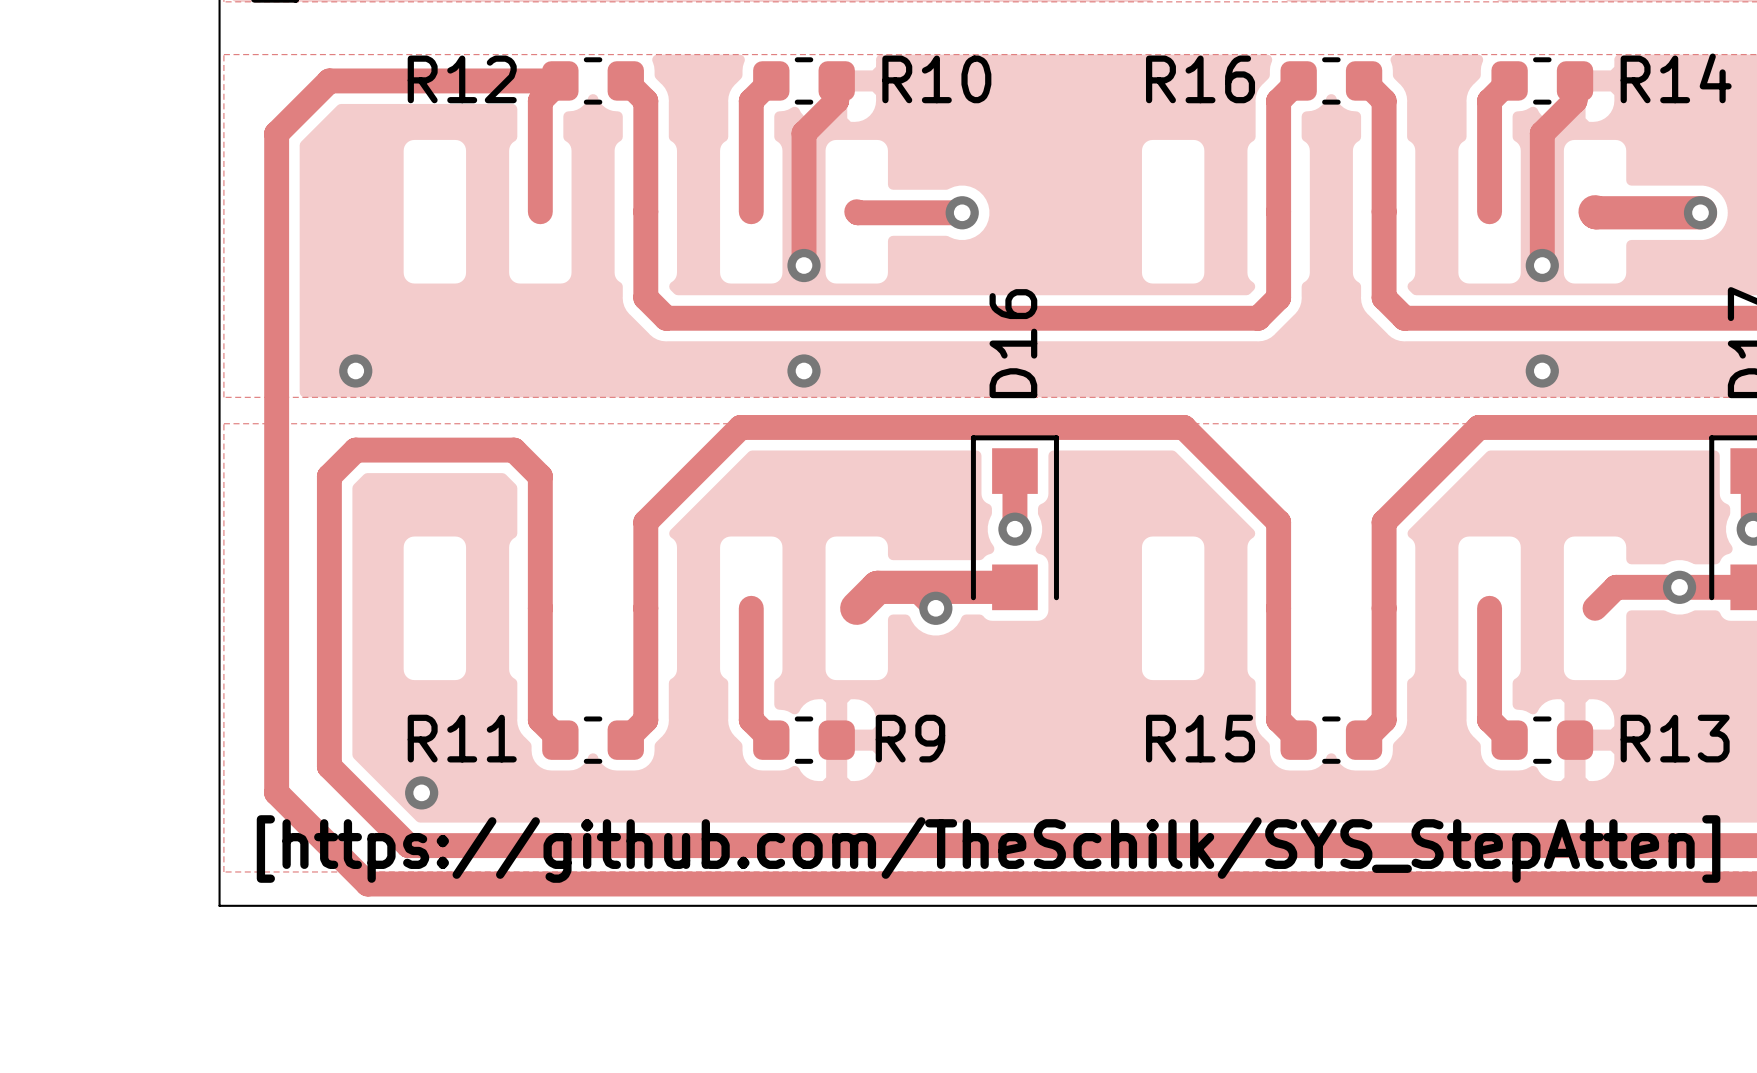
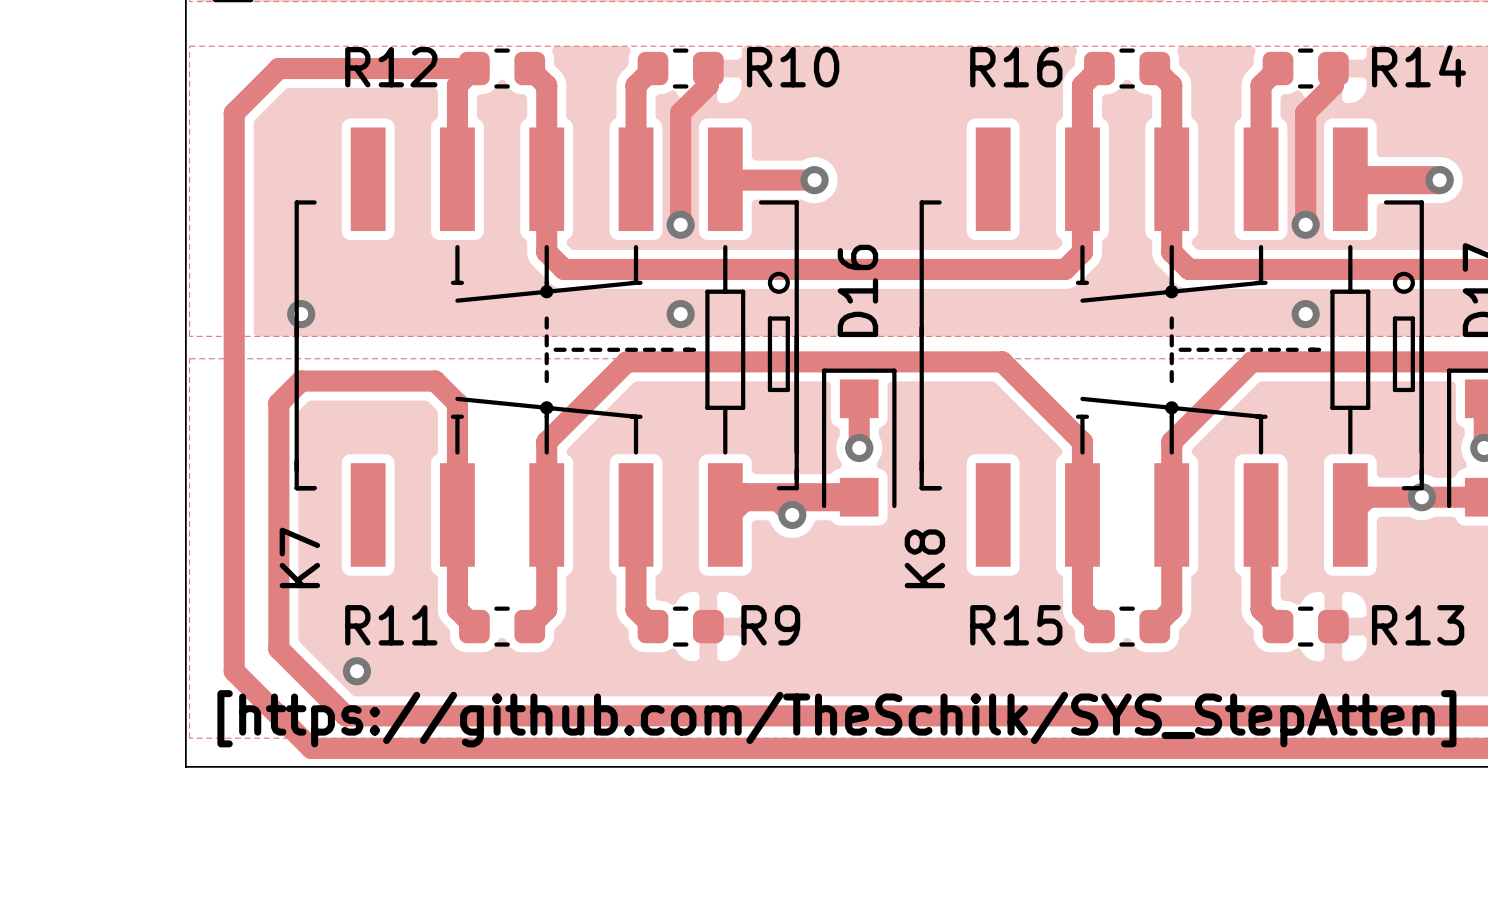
K7: none -> (546, 347)
K8: none -> (1171, 347)

